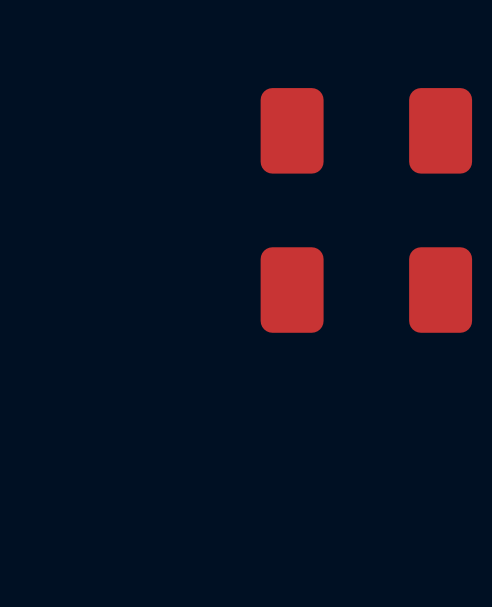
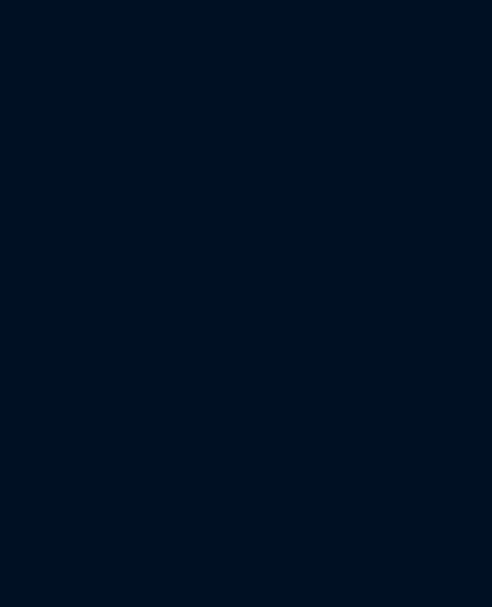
part: (366, 130) -> none
part: (366, 290) -> none

